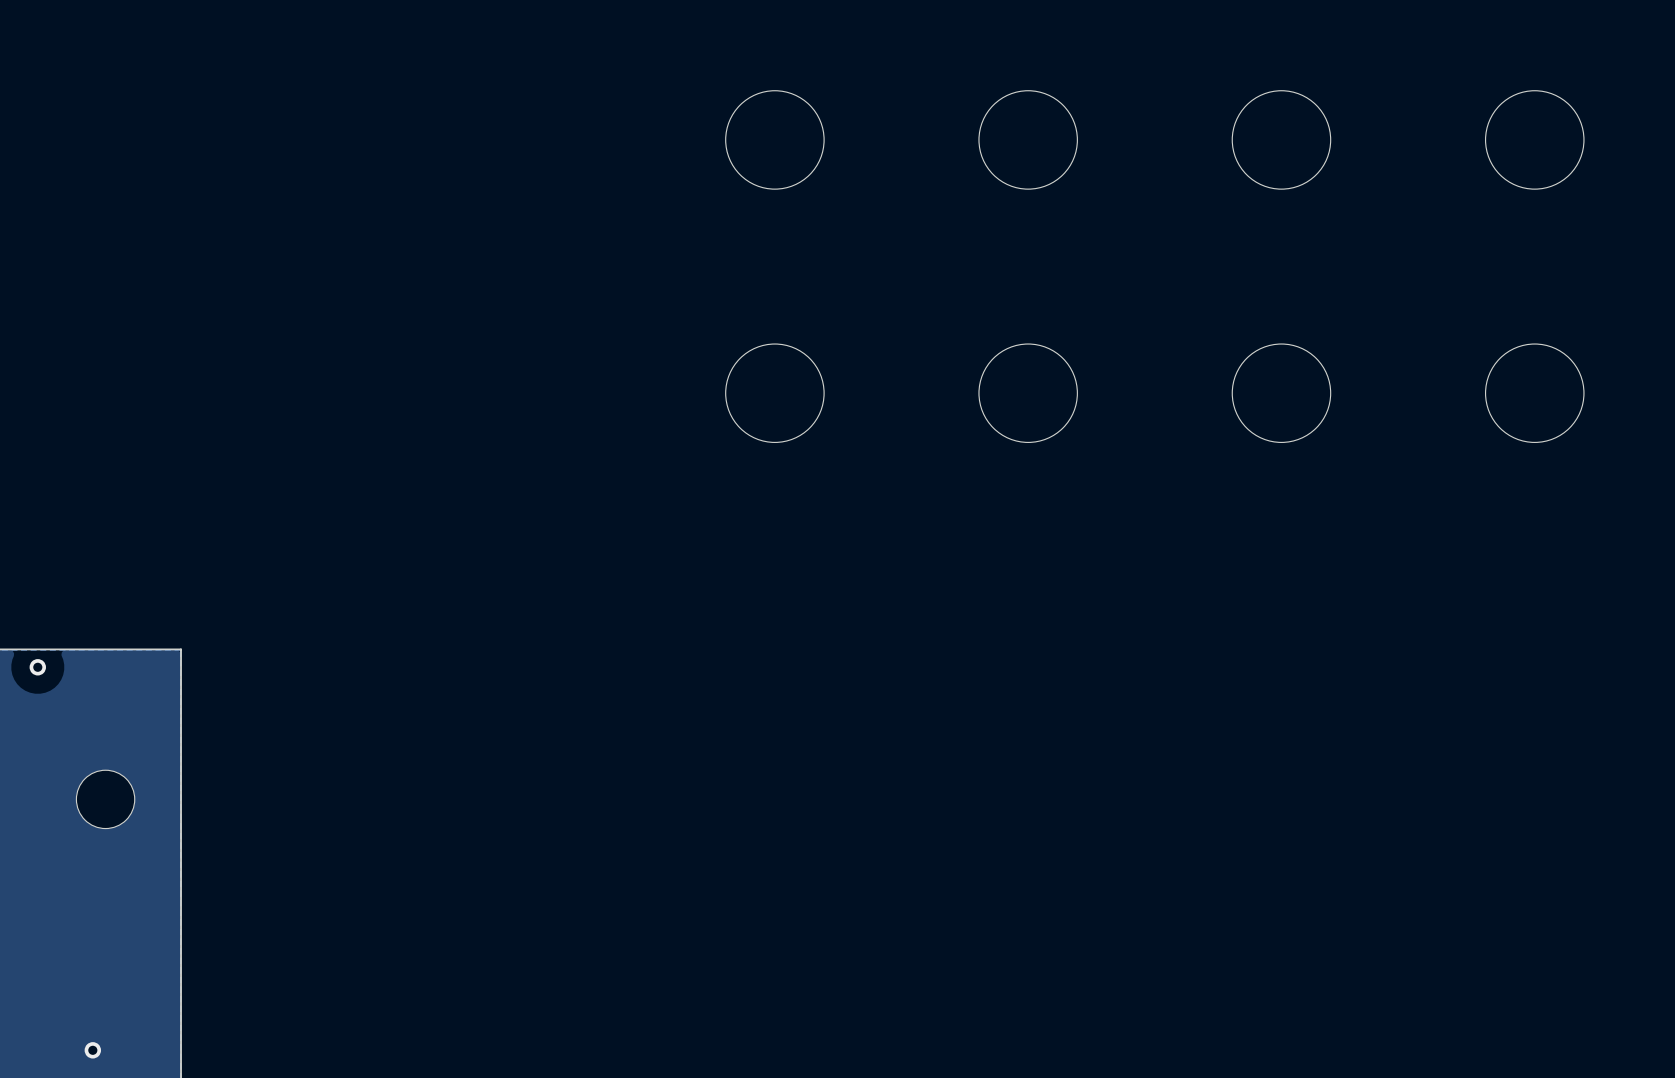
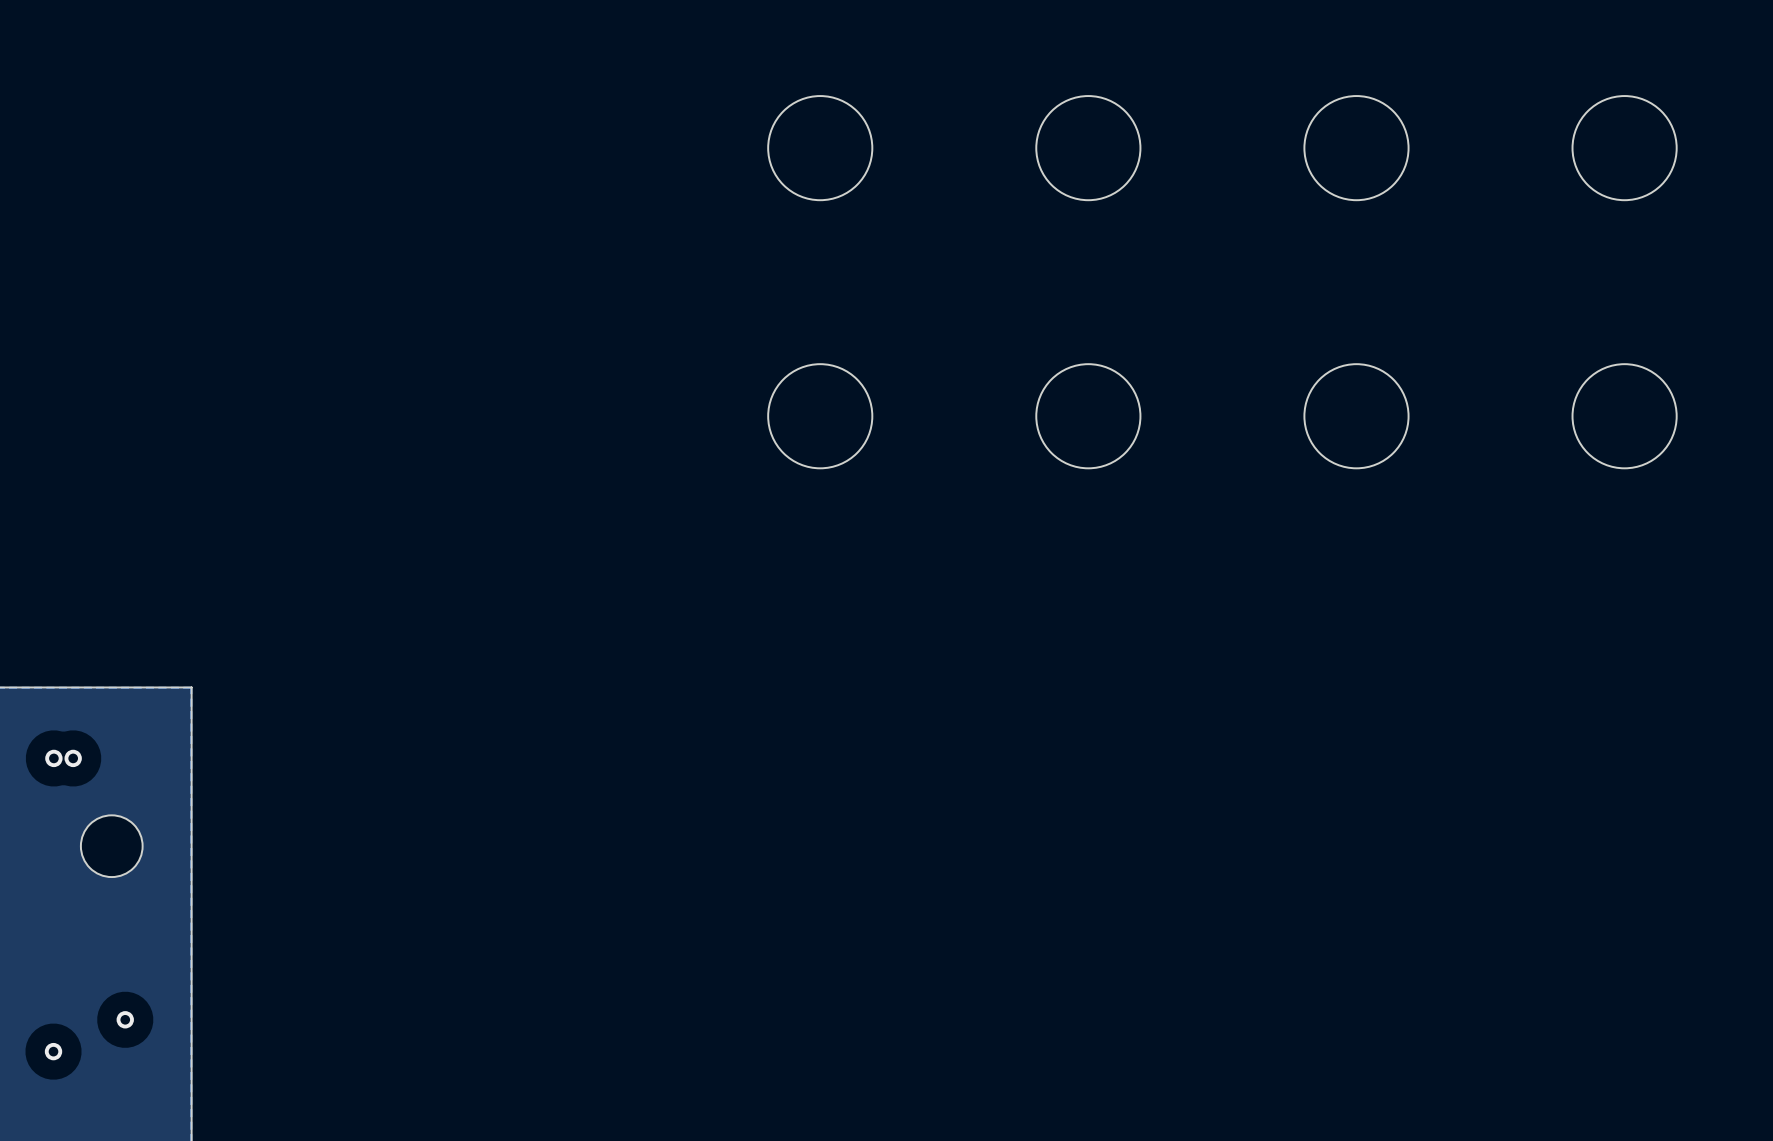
via: (37, 667) -> none
via: none -> (53, 758)
via: none -> (73, 758)
via: none -> (125, 1019)
via: none -> (53, 1051)
via: (92, 1050) -> none

